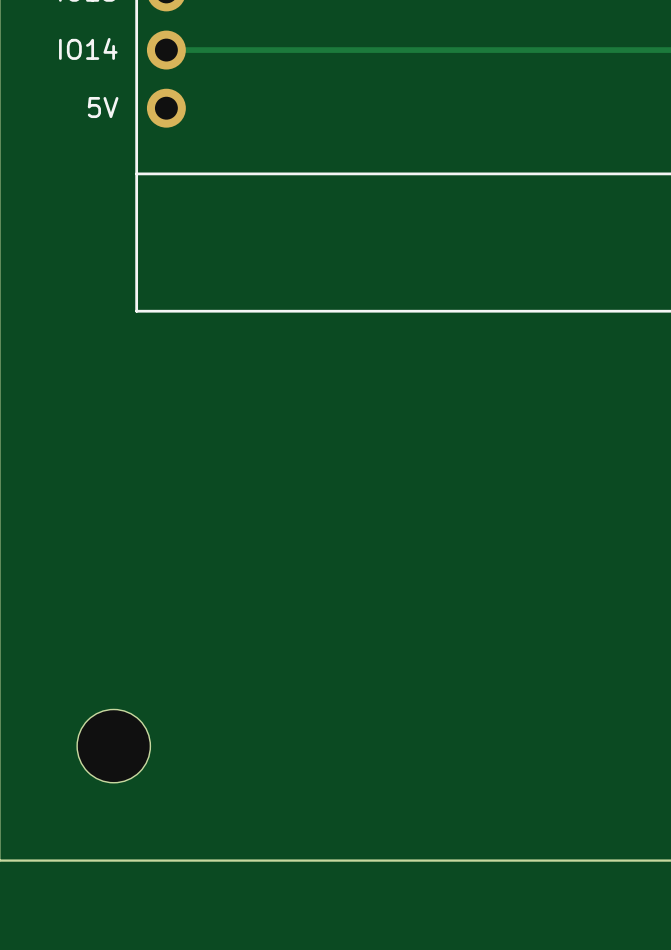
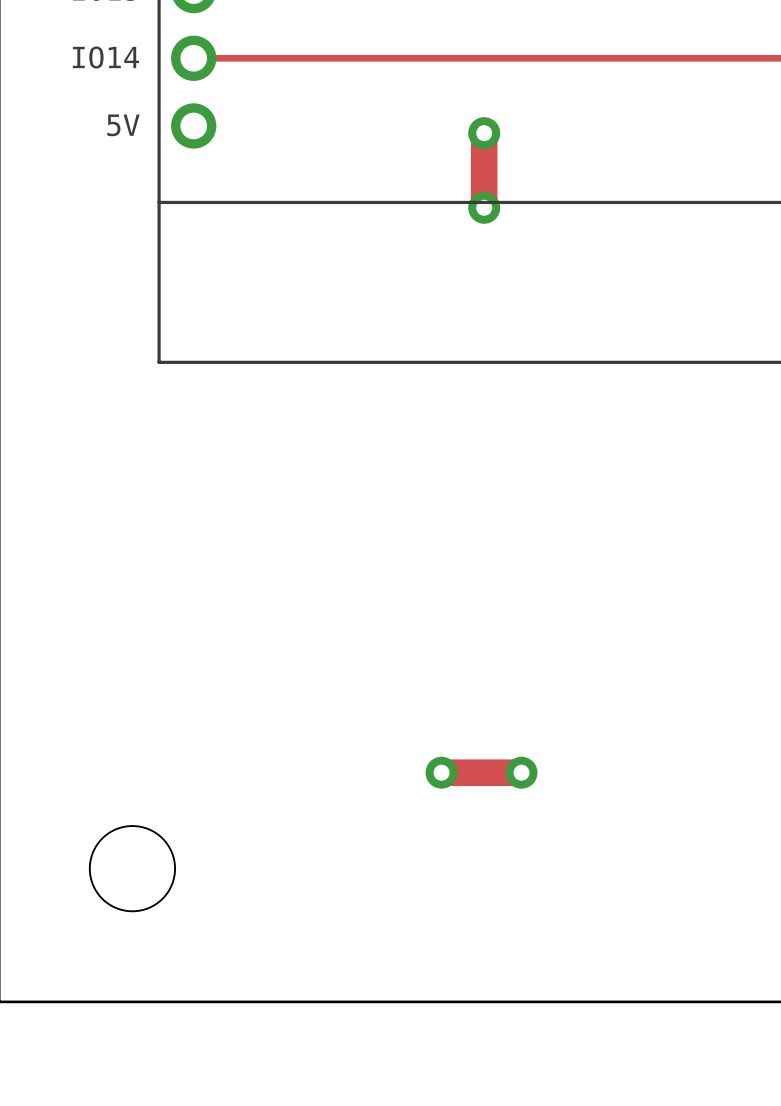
track: none -> (484, 133) (484, 207)
via: none -> (484, 133)
via: none -> (484, 207)
track: none -> (441, 772) (521, 772)
via: none -> (441, 772)
via: none -> (521, 772)

